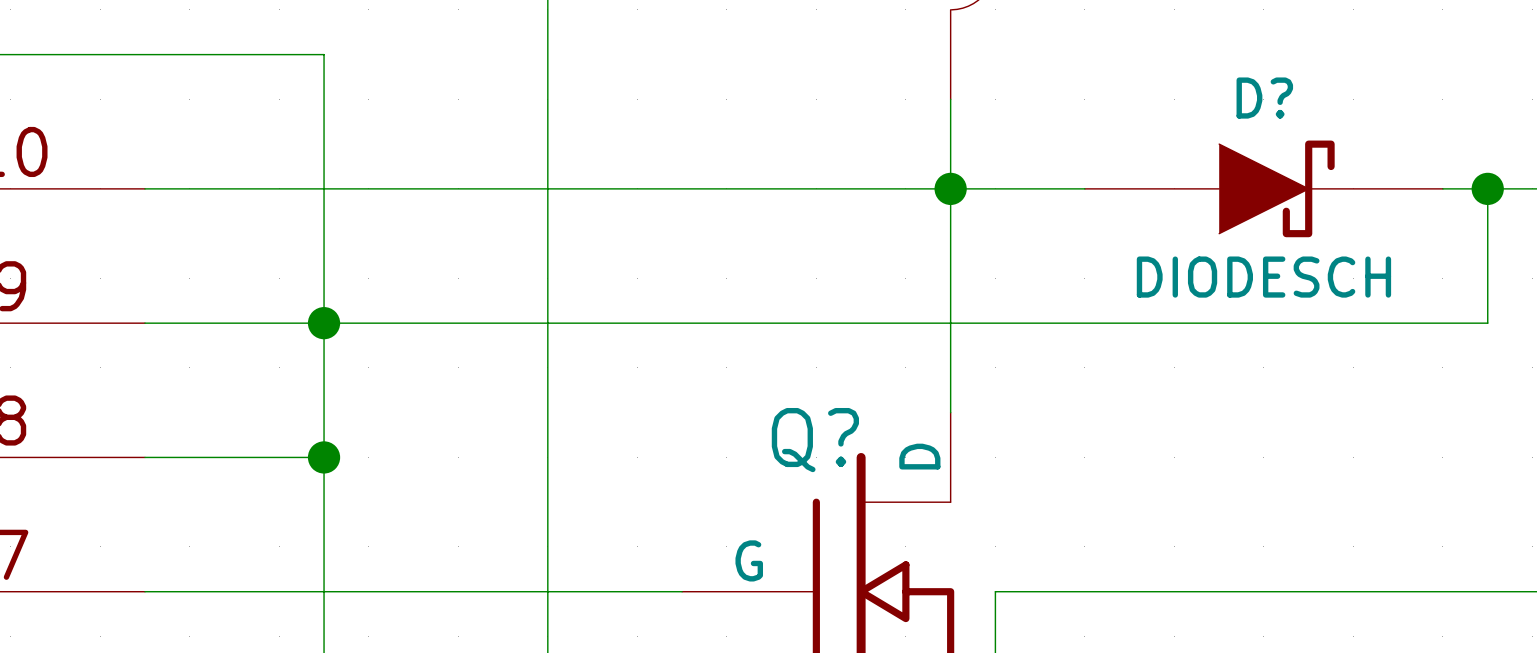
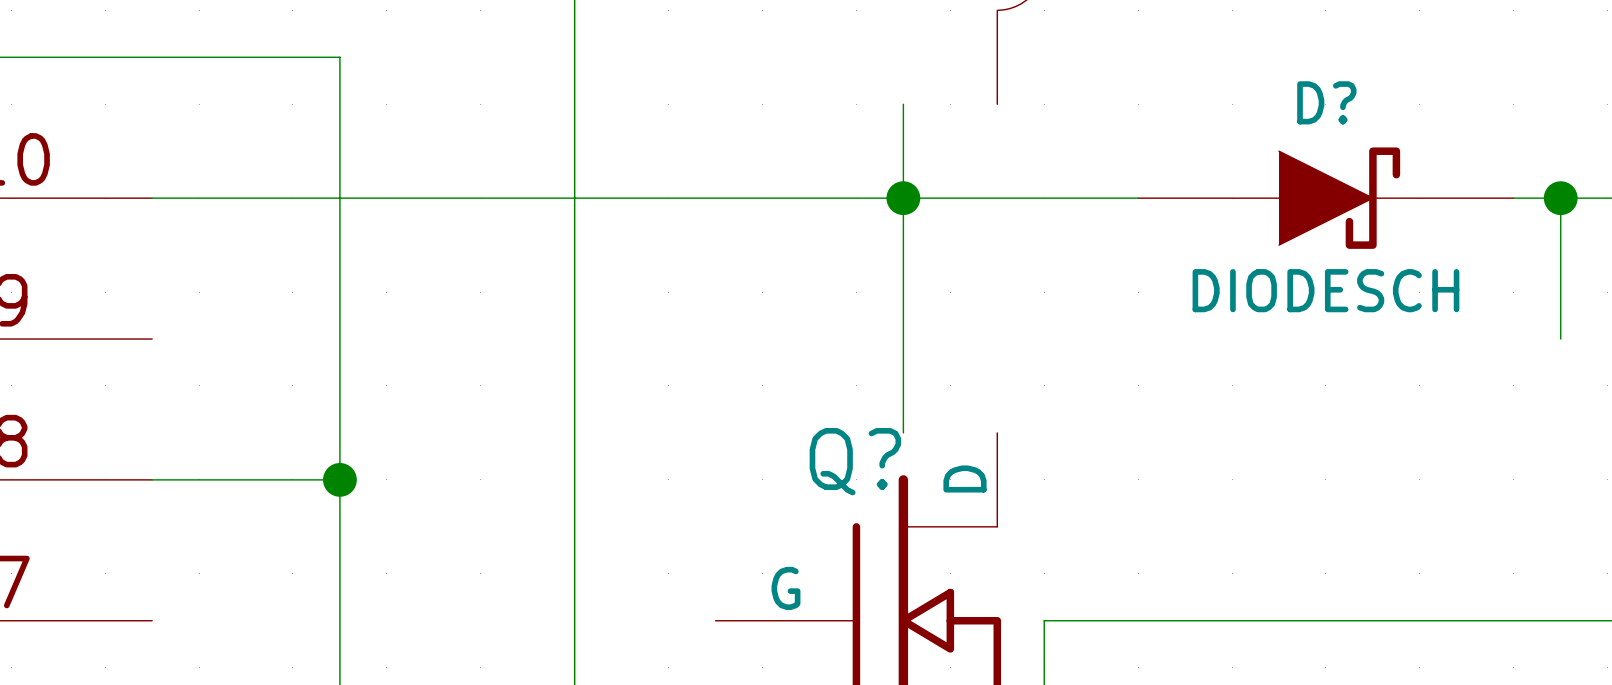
wire: (950, 99) (950, 412) -> (903, 104) (903, 432)
junction position: (950, 188) -> (903, 198)
wire: (145, 323) (1487, 323) -> none
junction: (324, 323) -> none
wire: (145, 591) (682, 591) -> none

